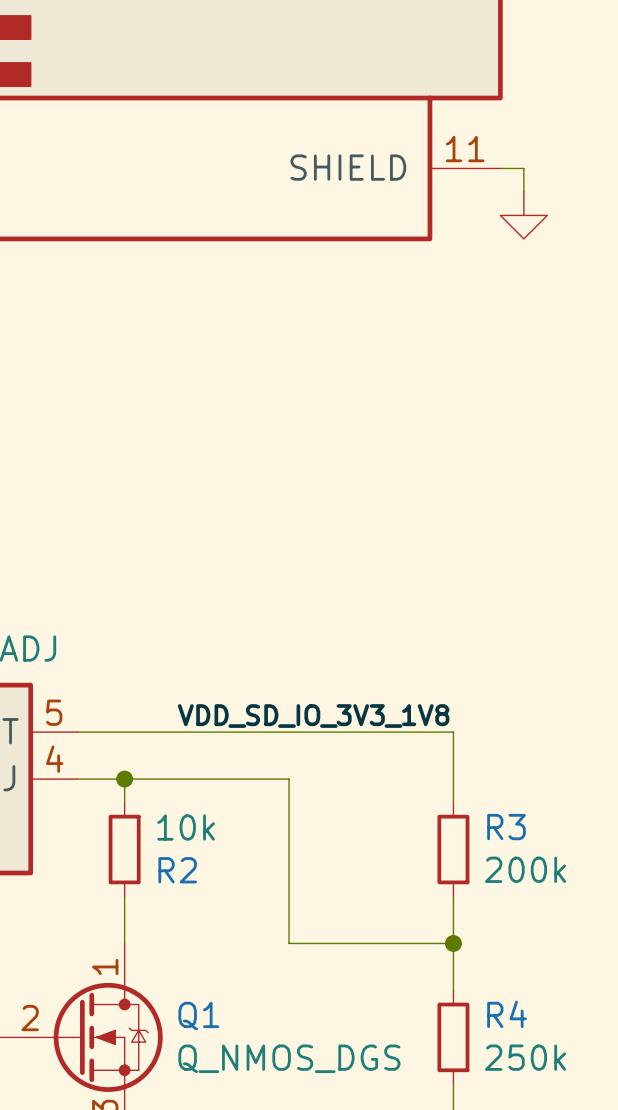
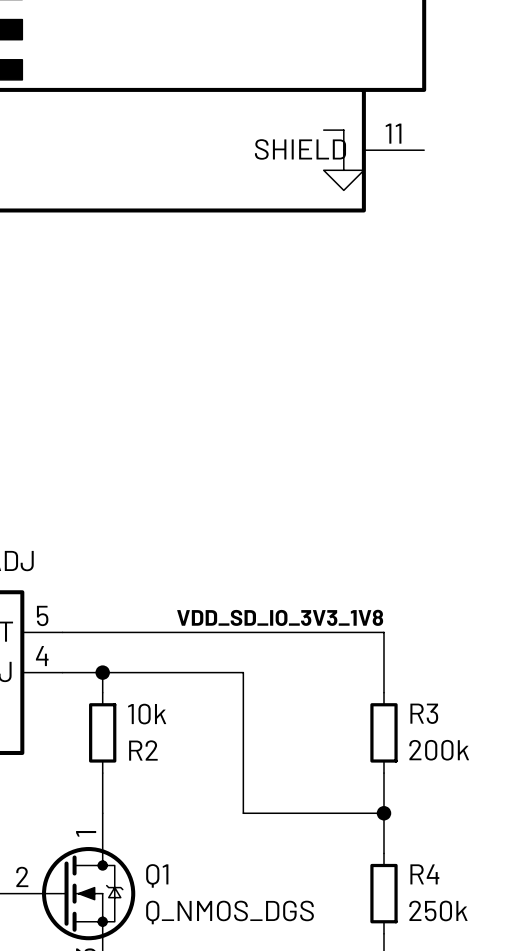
wire: (500, 168) (523, 168) (523, 191) -> (323, 130) (343, 130) (343, 150)
power symbol position: (523, 215) -> (343, 170)

